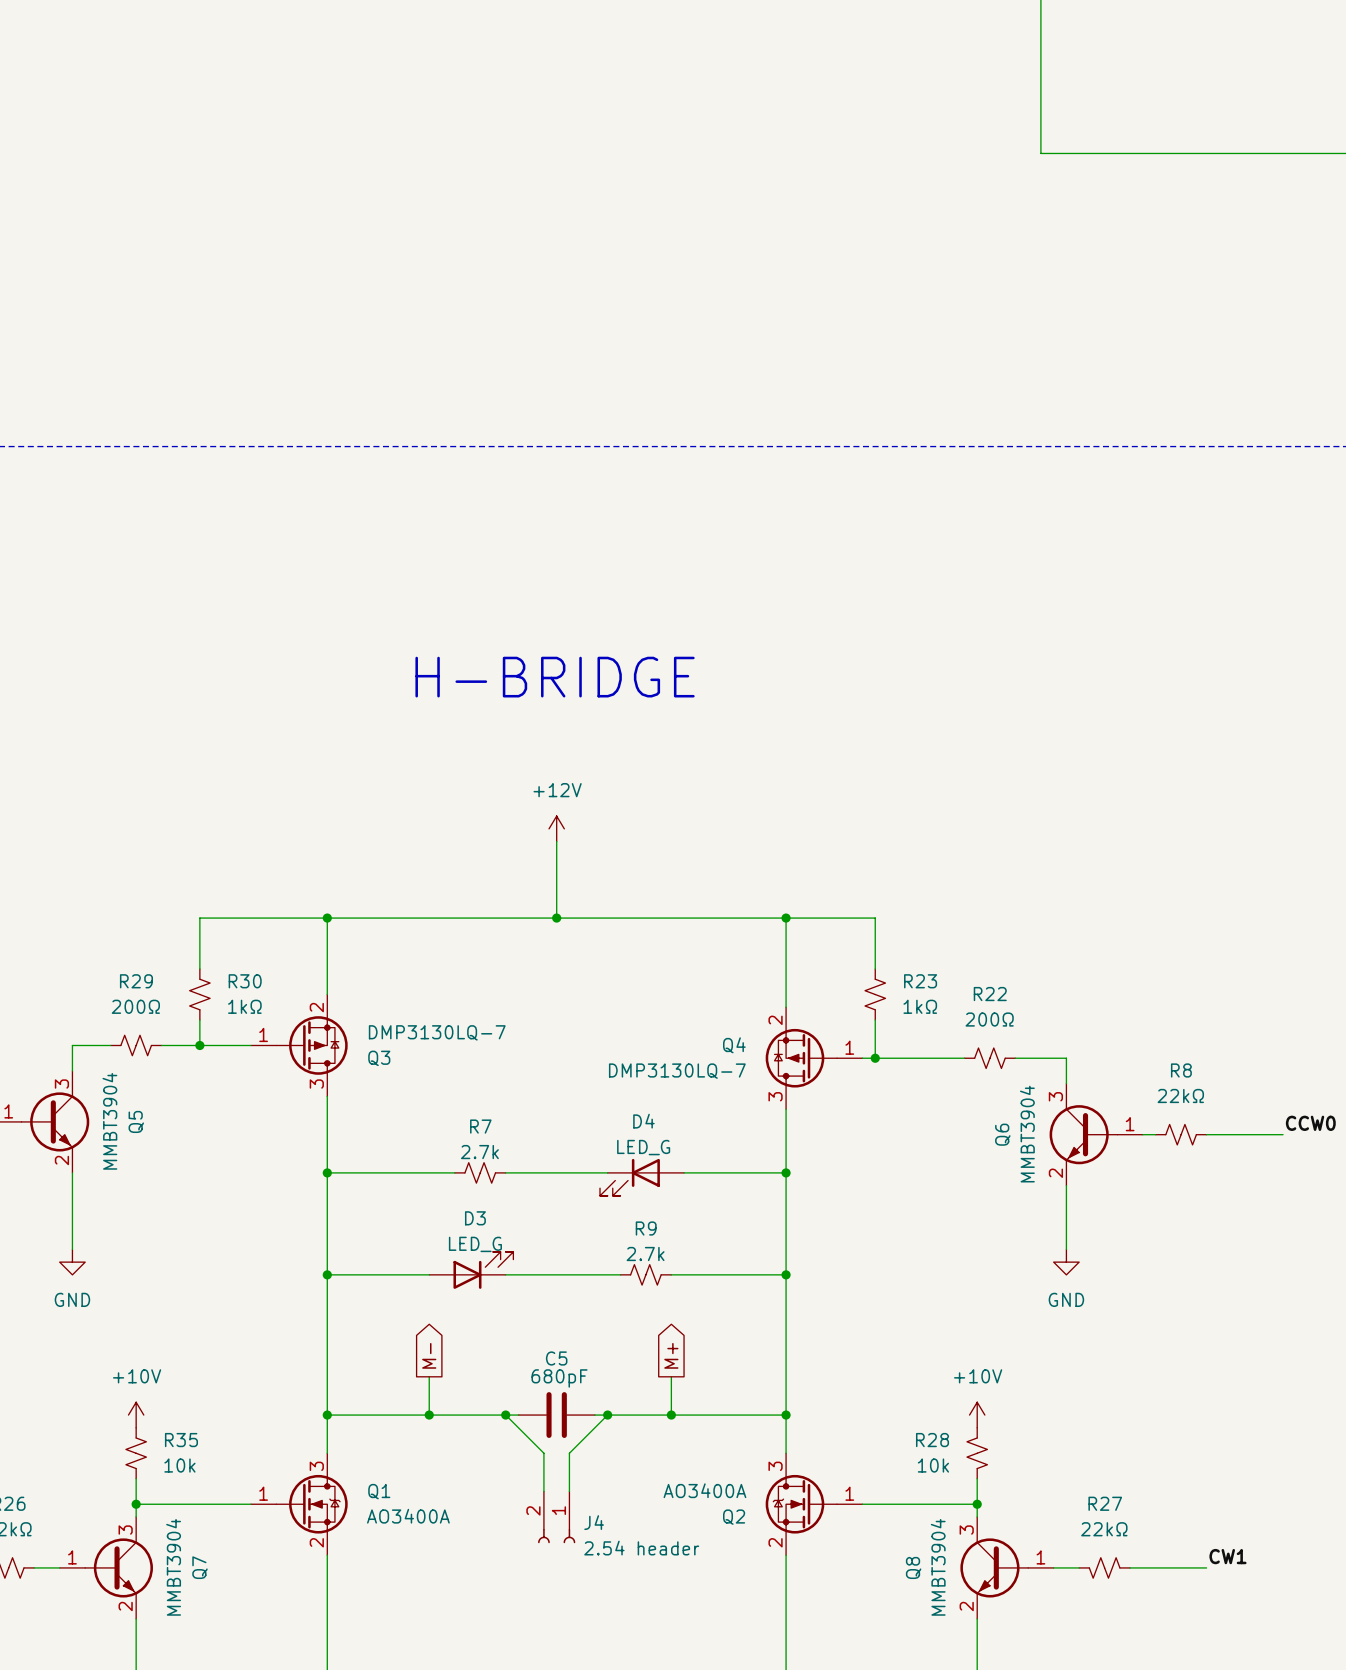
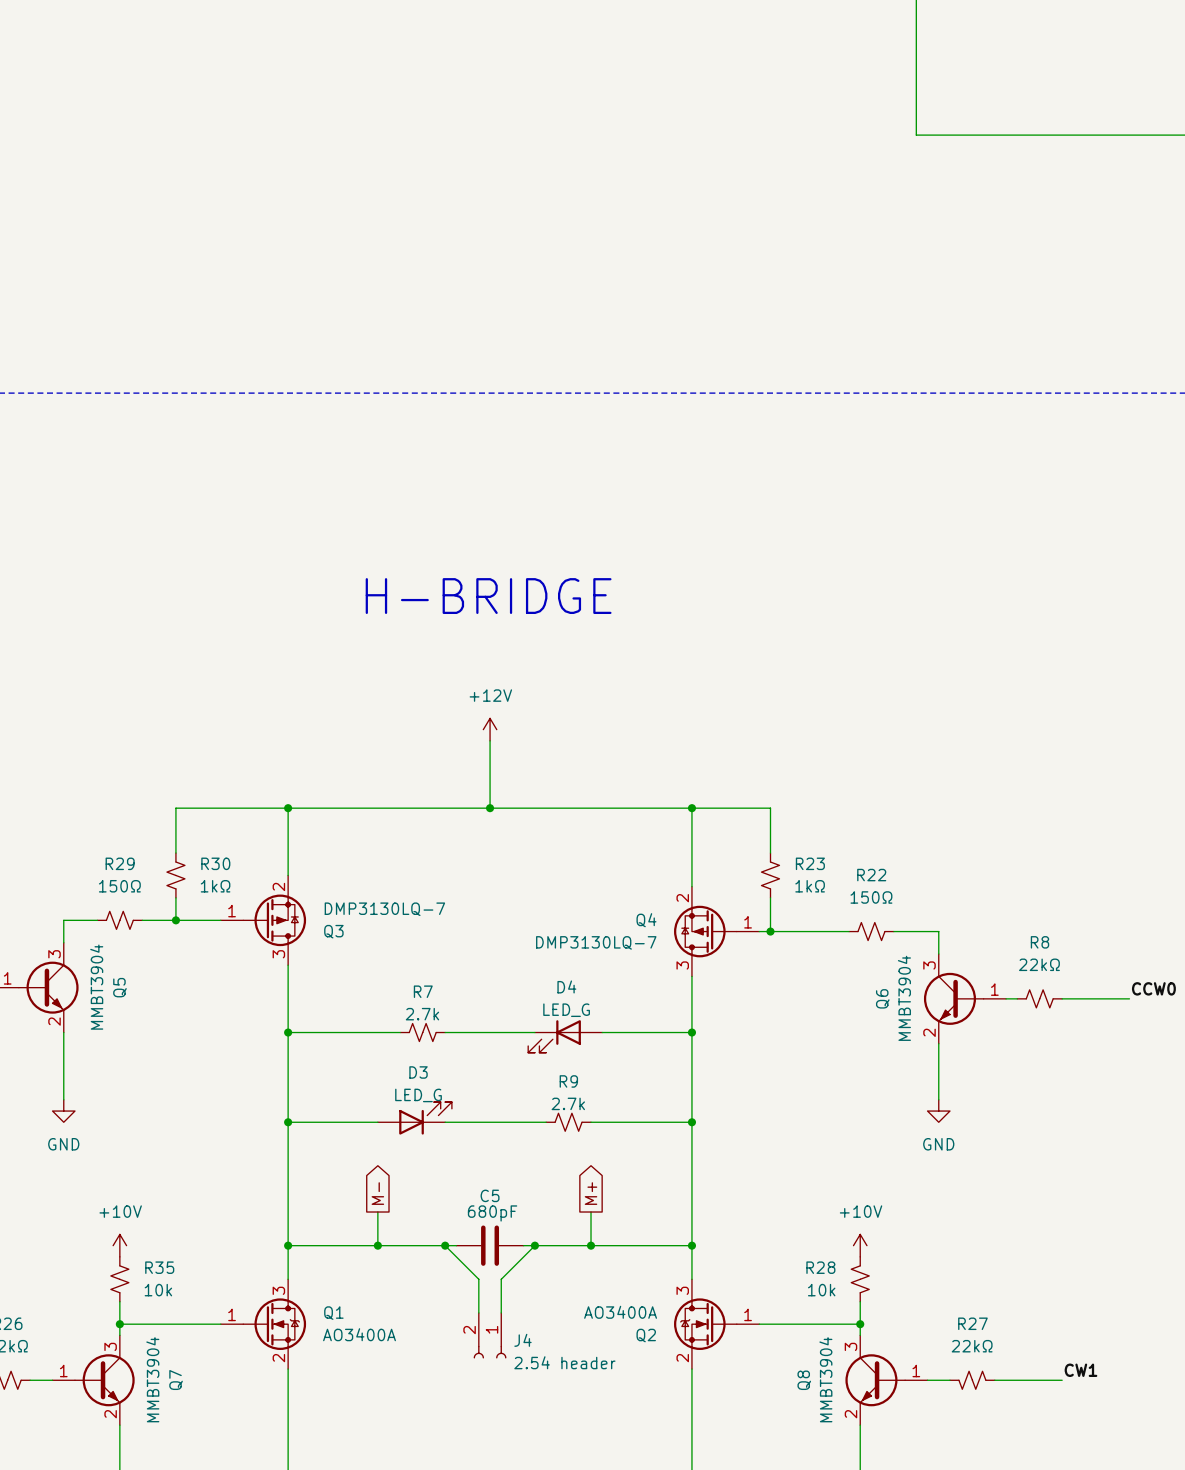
R29 value: 200Ω (135, 1006) -> 150Ω (119, 886)
R22 value: 200Ω (989, 1019) -> 150Ω (871, 897)

